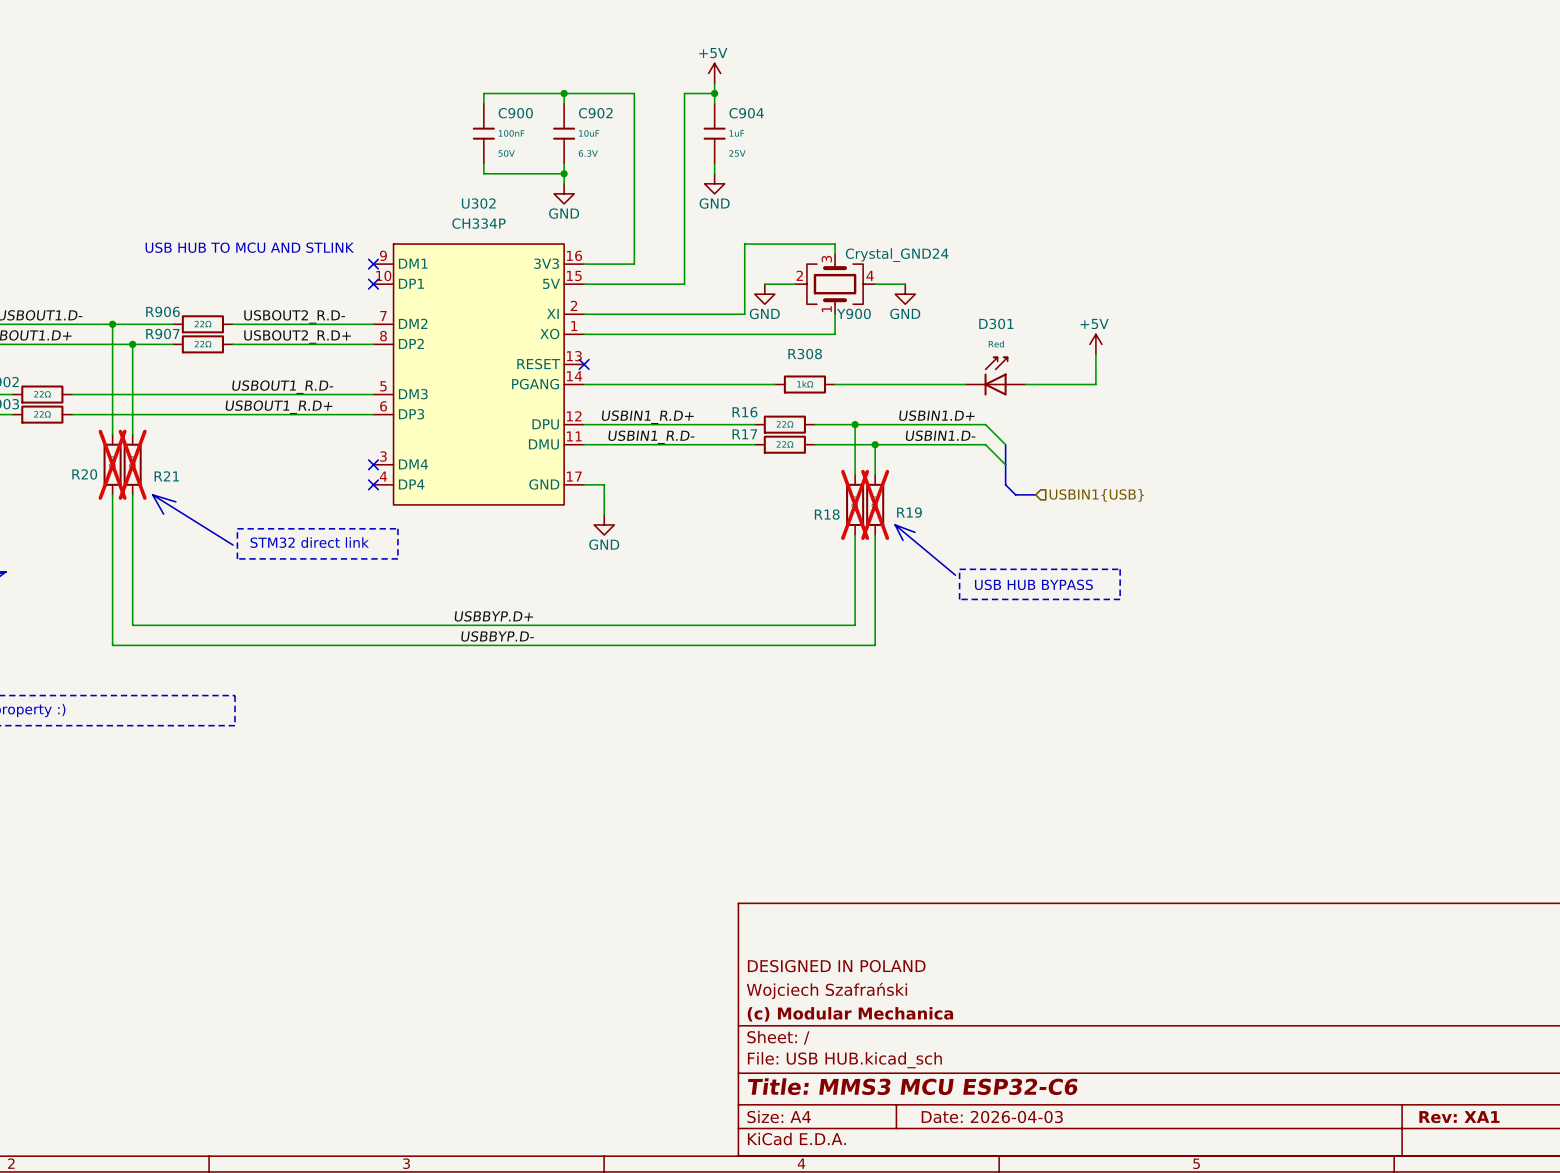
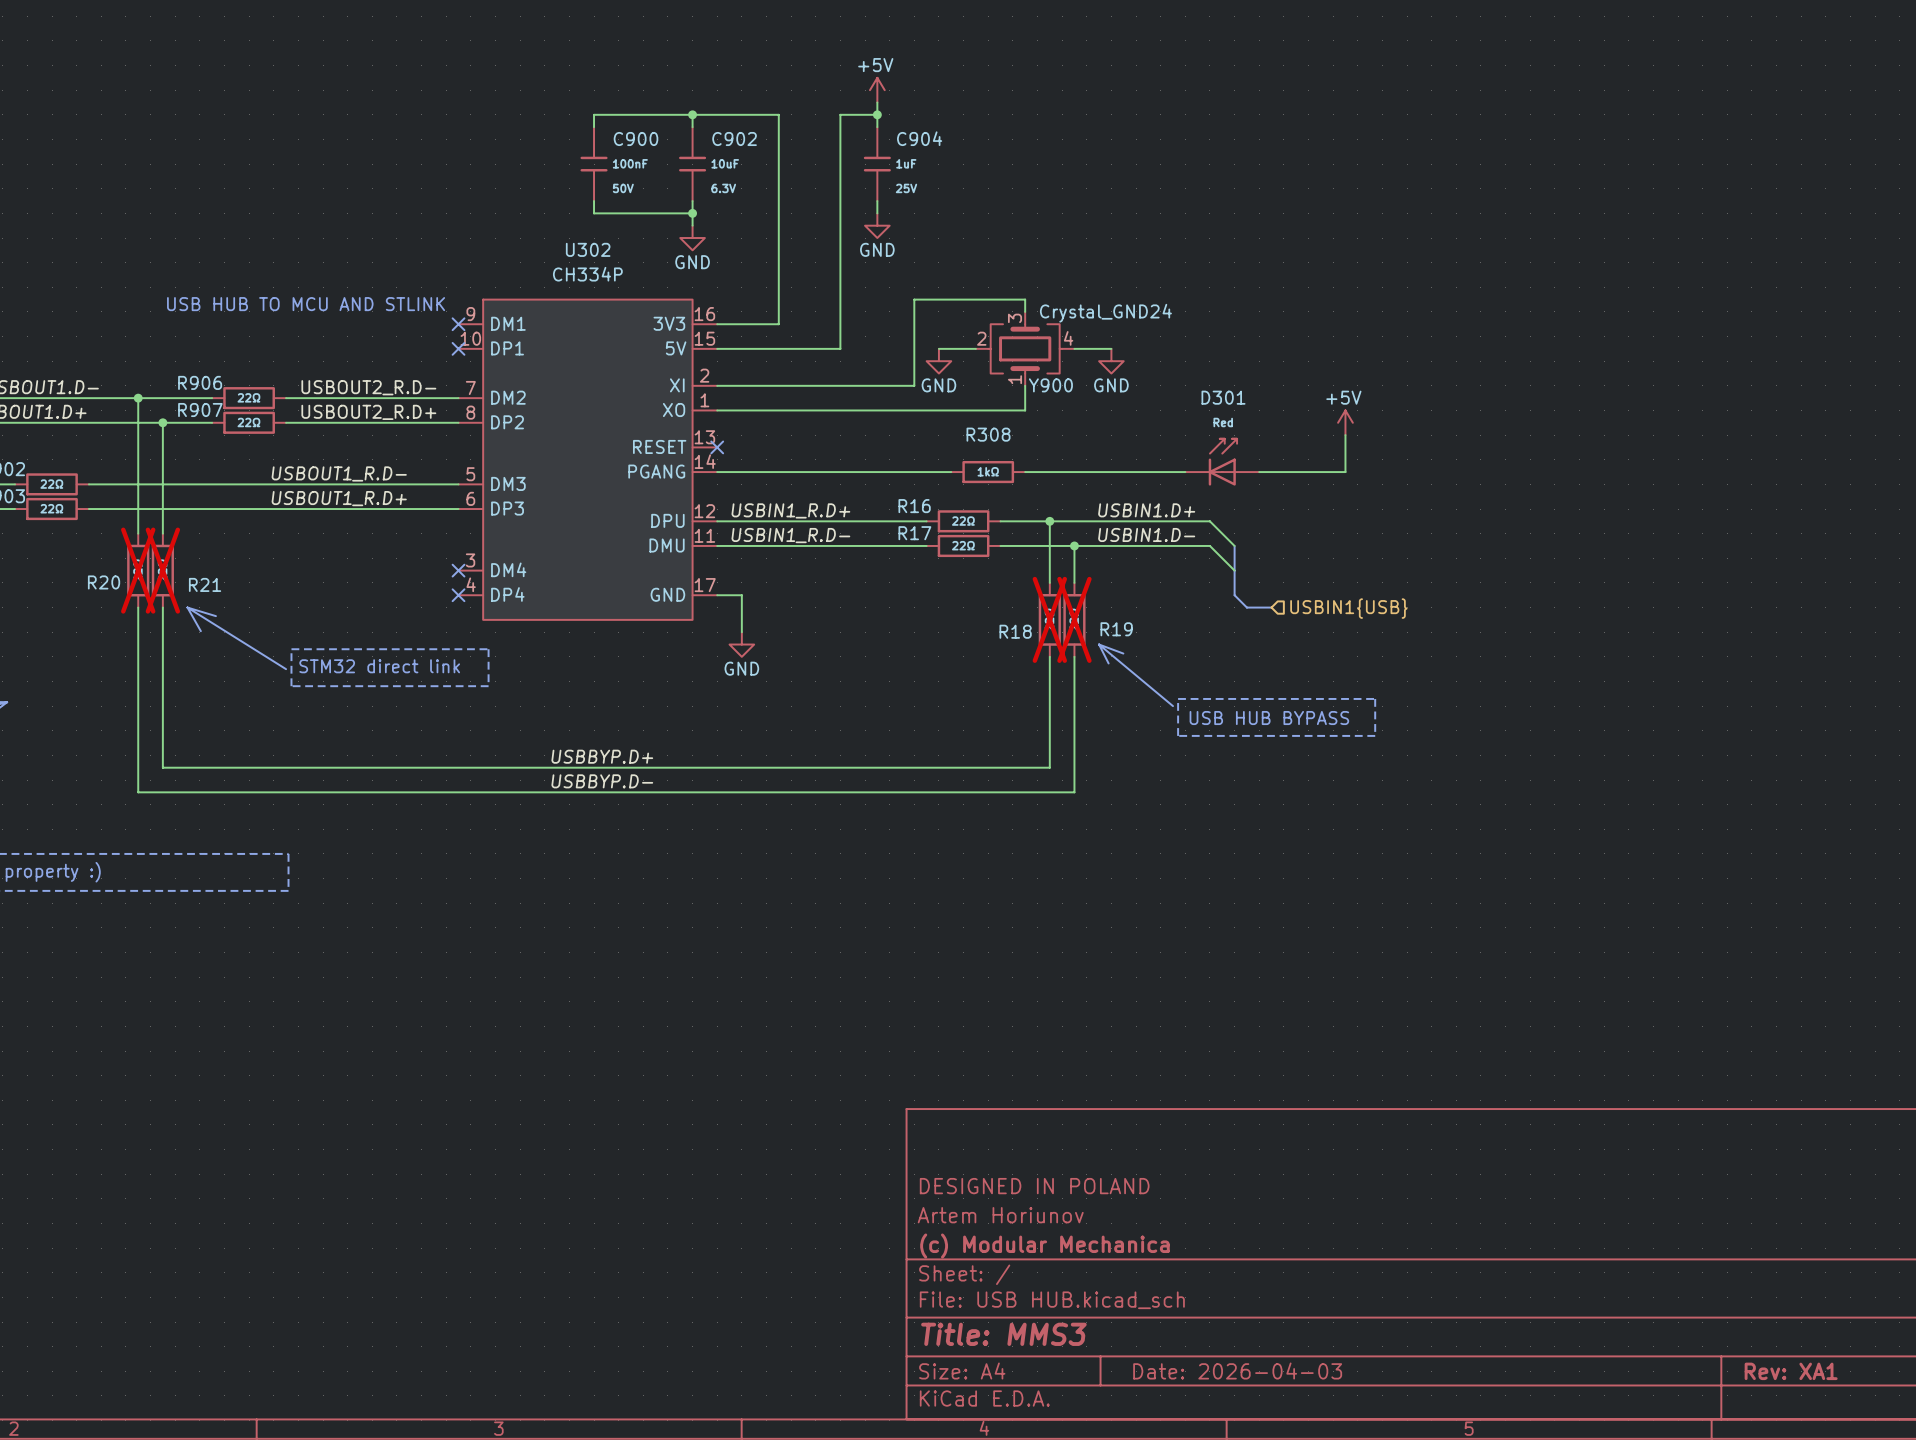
title block: Wojciech Szafrański (826, 990) -> Artem Horiunov (1000, 1215)
title block: Title: MMS3 MCU ESP32-C6 (912, 1086) -> Title: MMS3 (1003, 1334)

